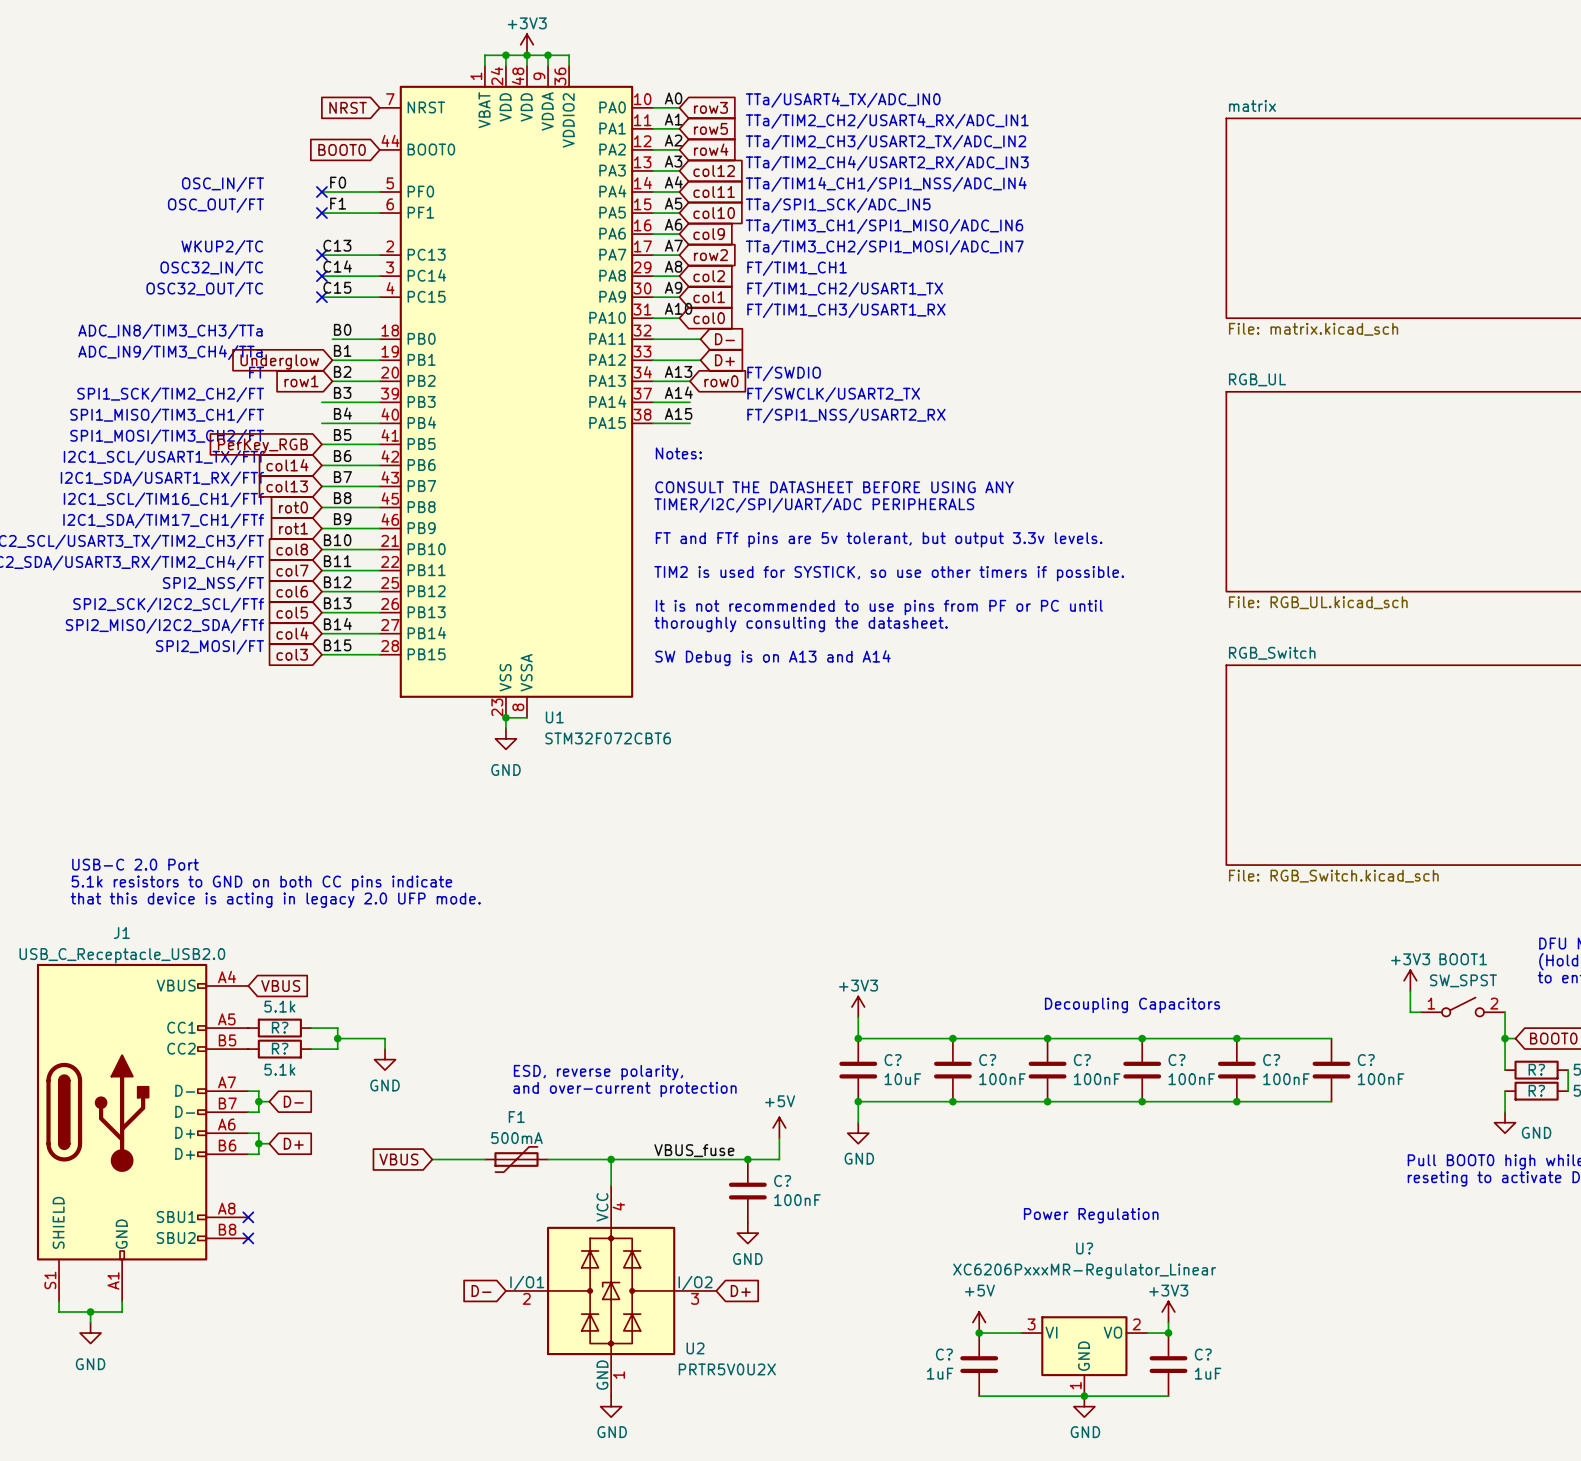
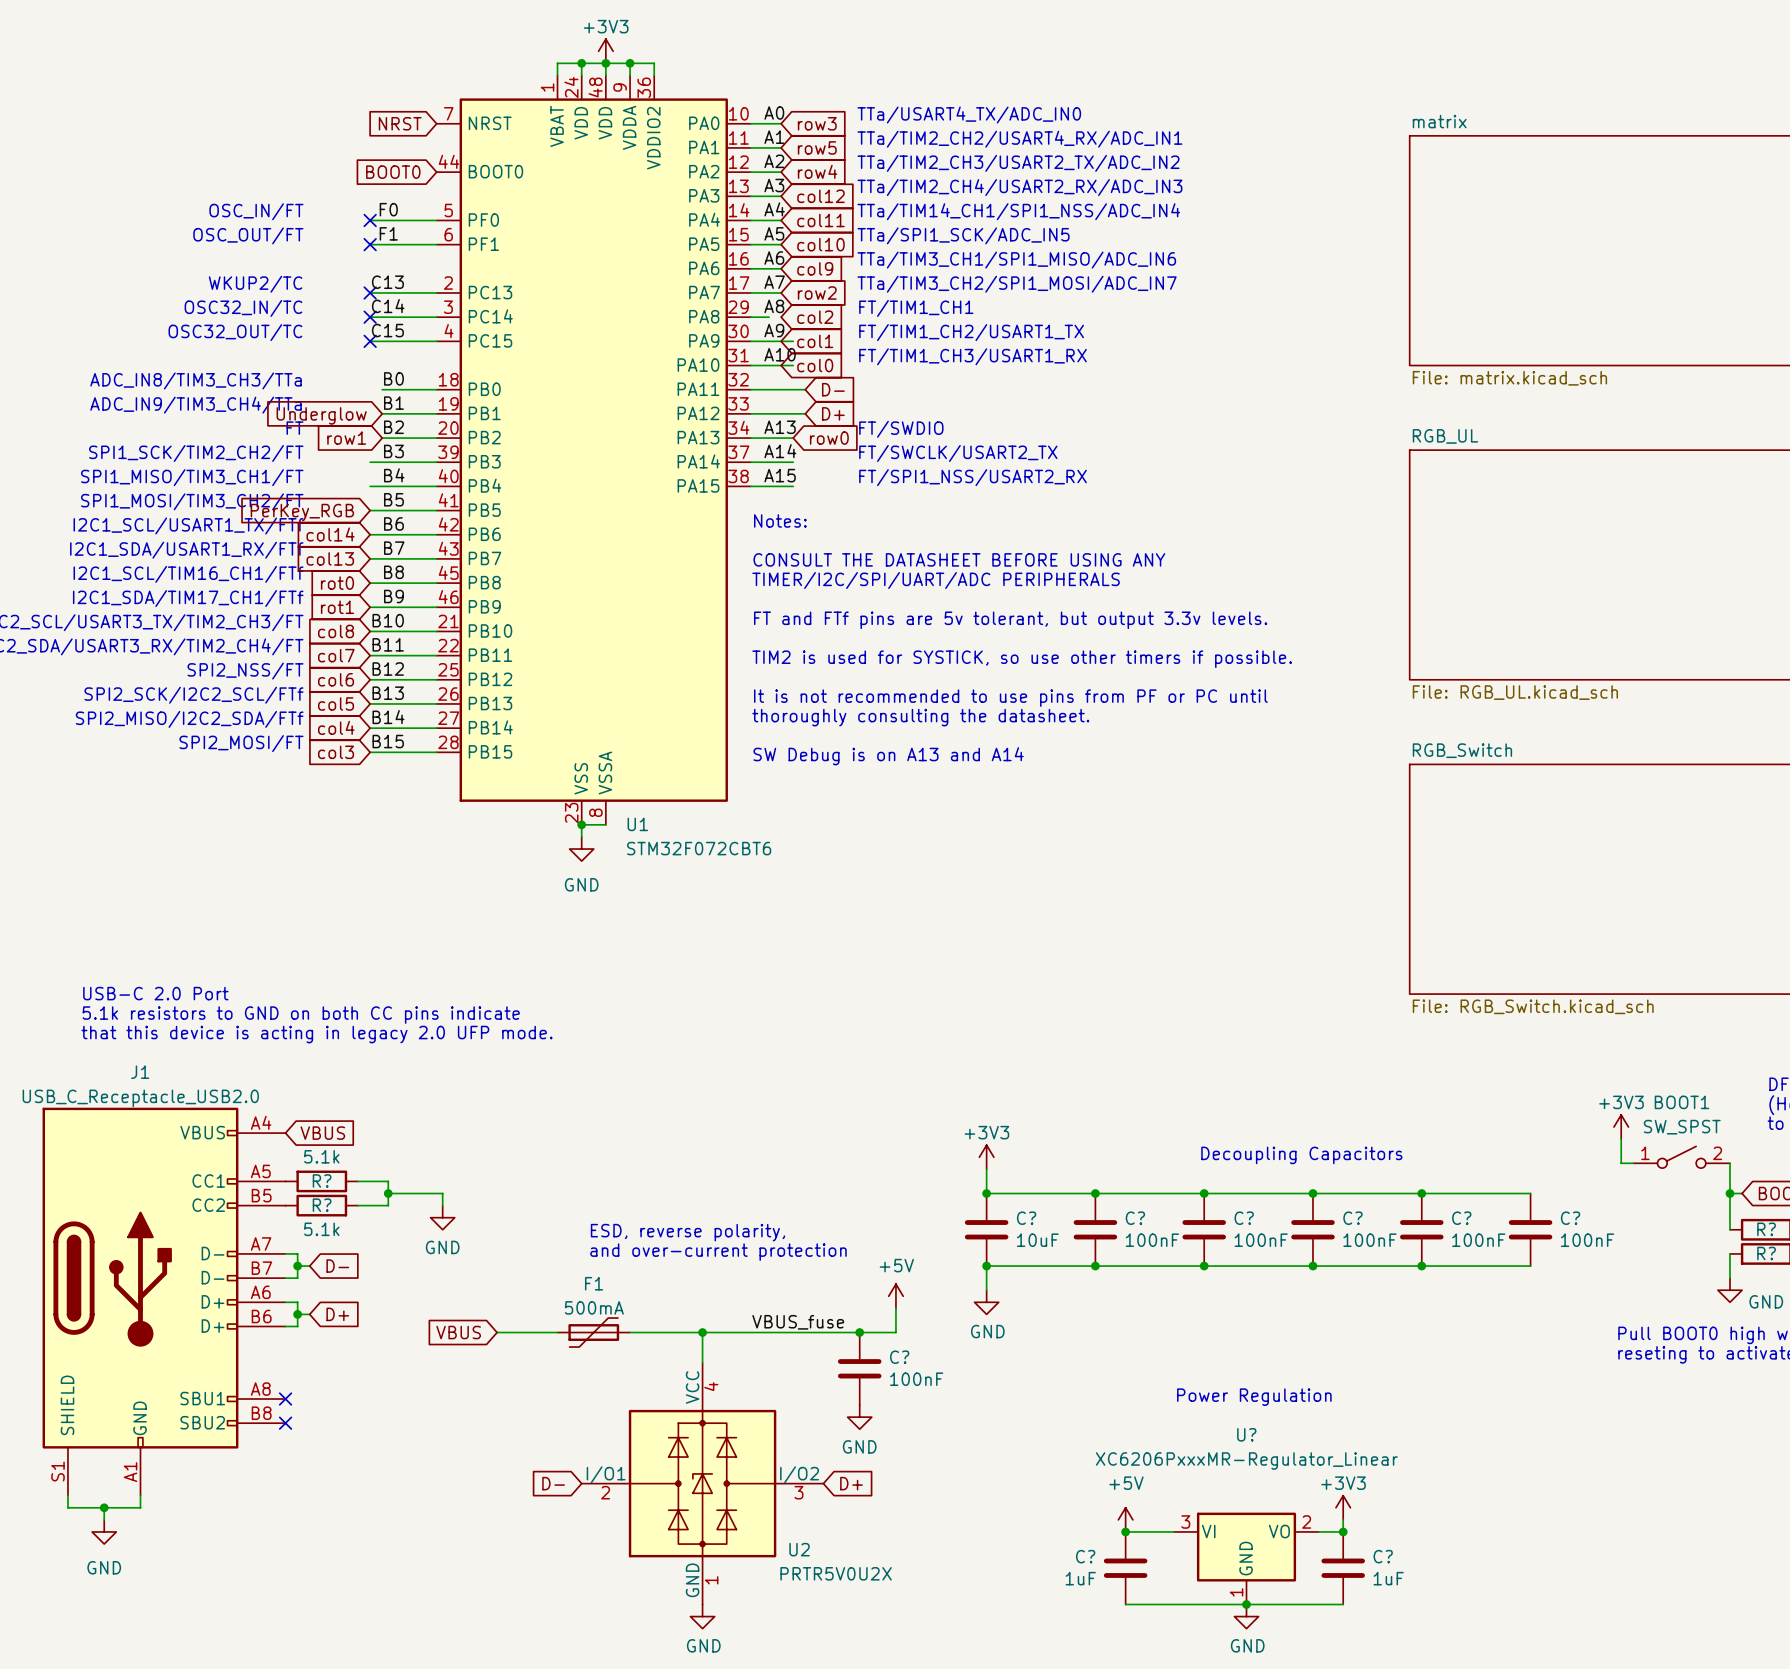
wire: (668, 276) (679, 276) -> (781, 341) (793, 341)
wire: none -> (781, 365) (793, 365)

